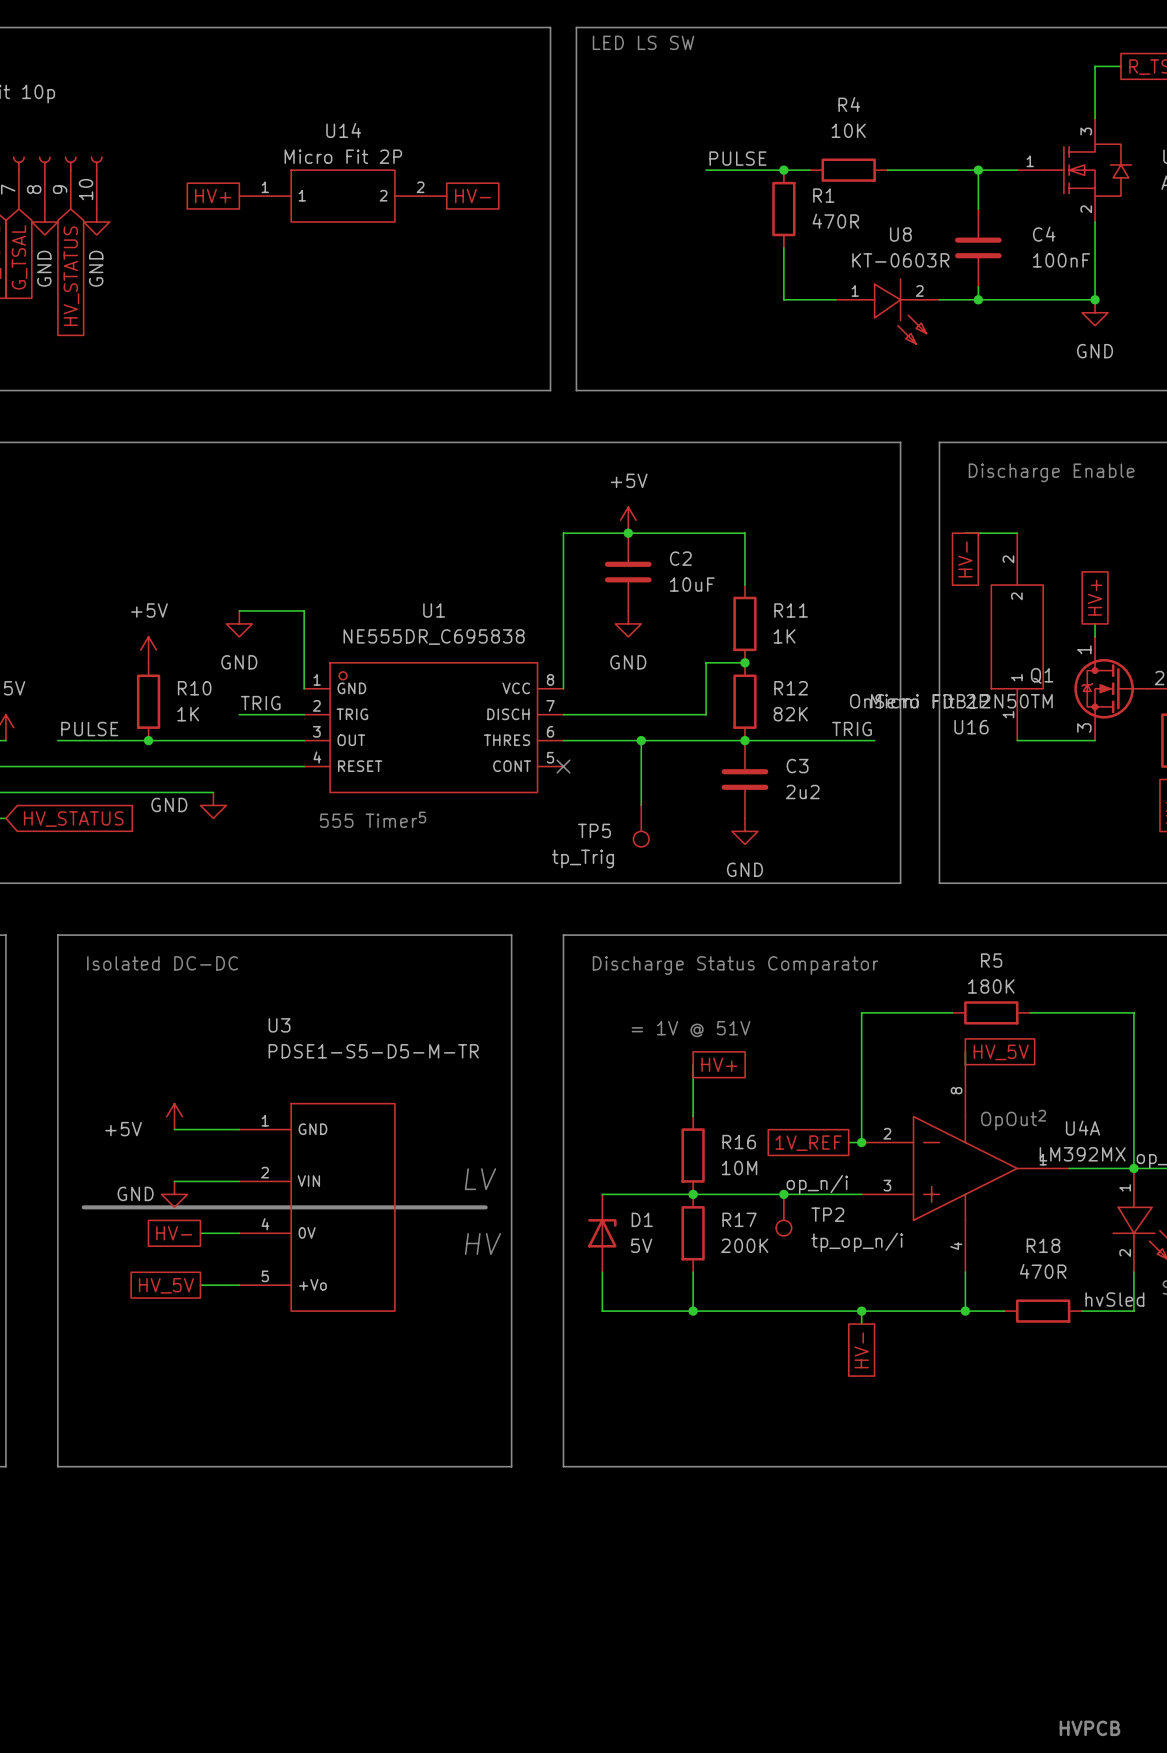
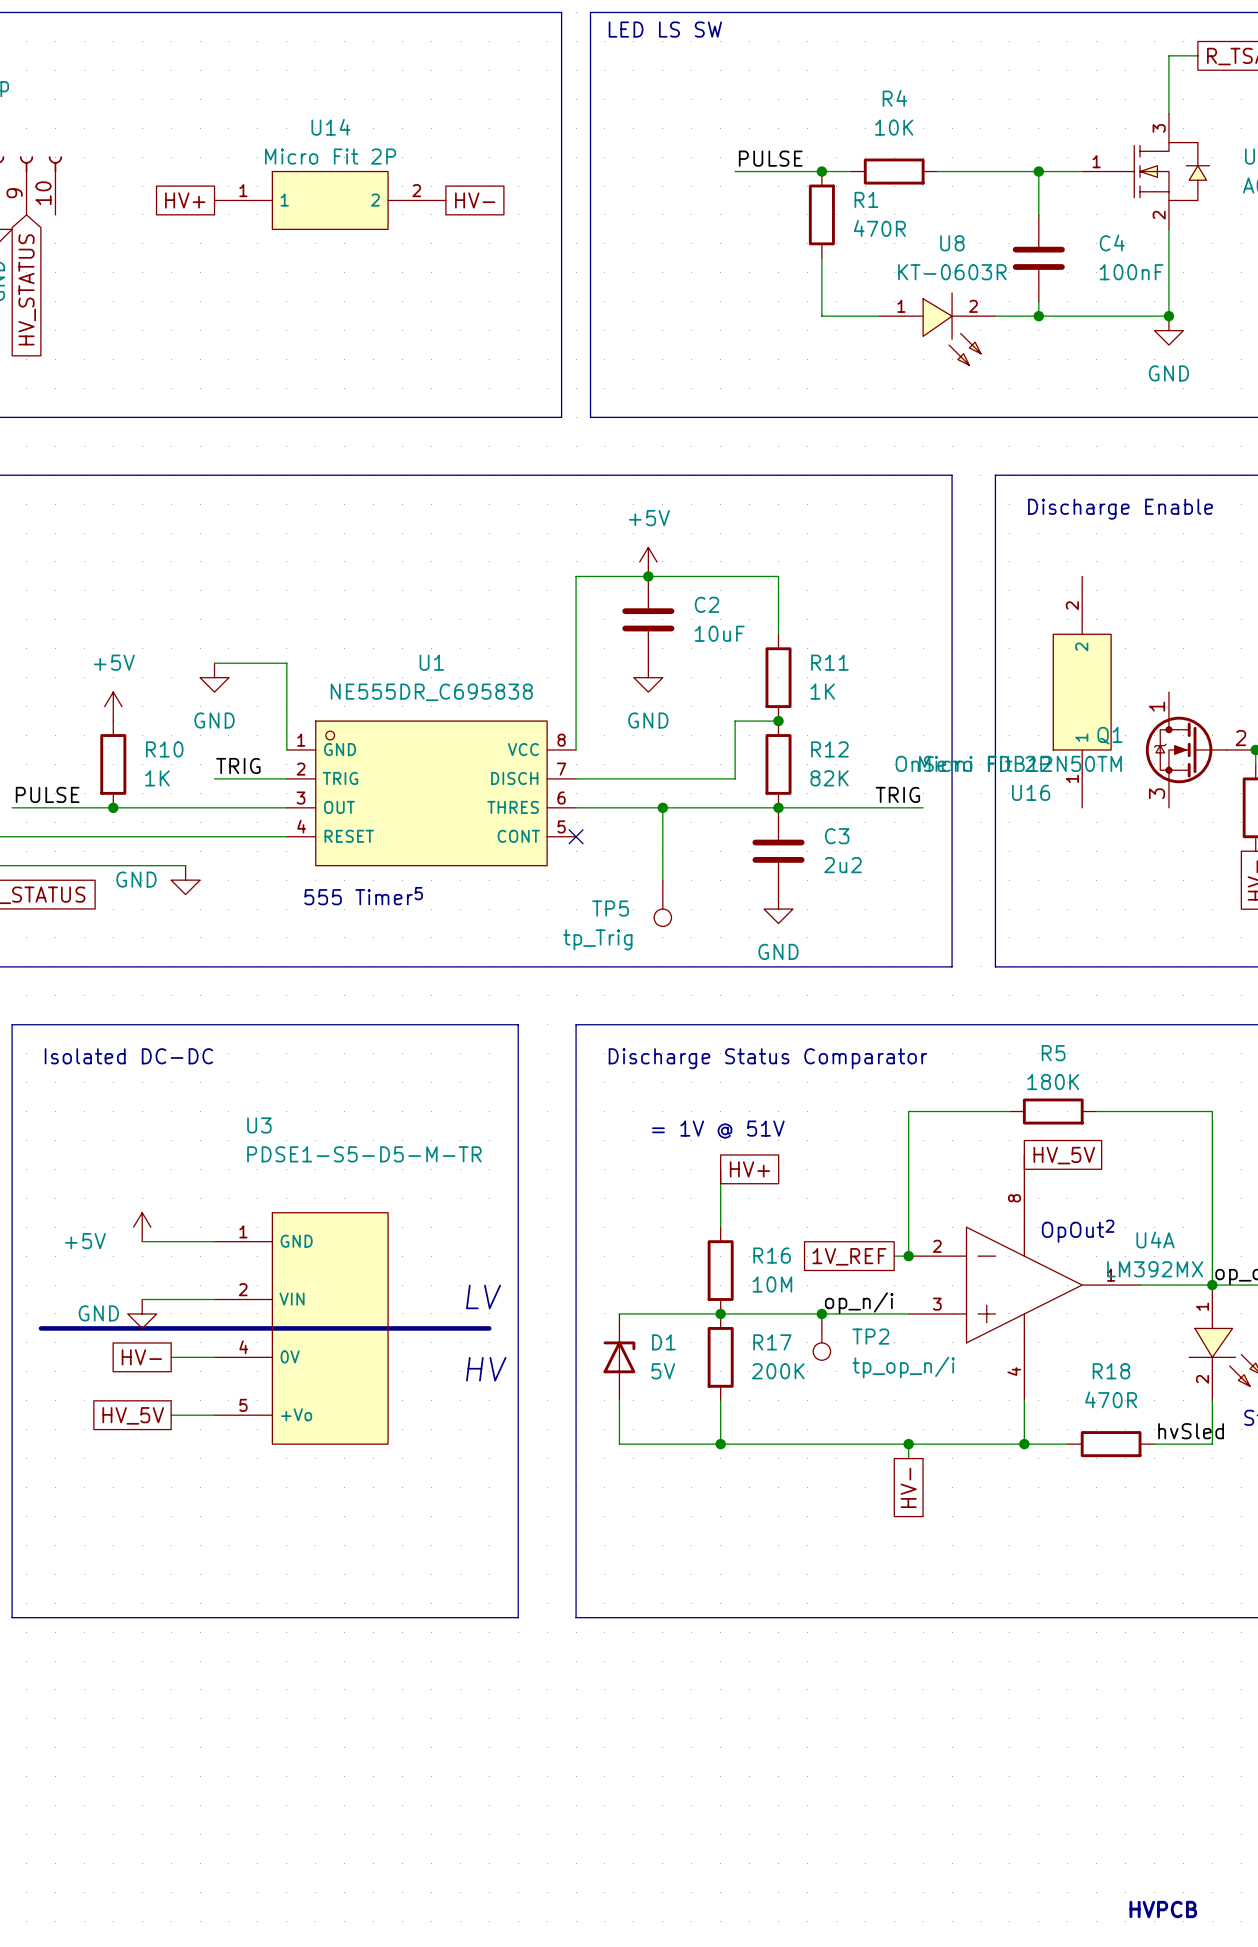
power symbol: GND (96, 222) -> none
wire: (965, 533) (1017, 533) -> none
global label: HV- (965, 559) -> none
global label: HV+ (1095, 597) -> none
wire: (1095, 623) (1095, 636) -> none
wire: (1017, 740) (1095, 740) -> none

